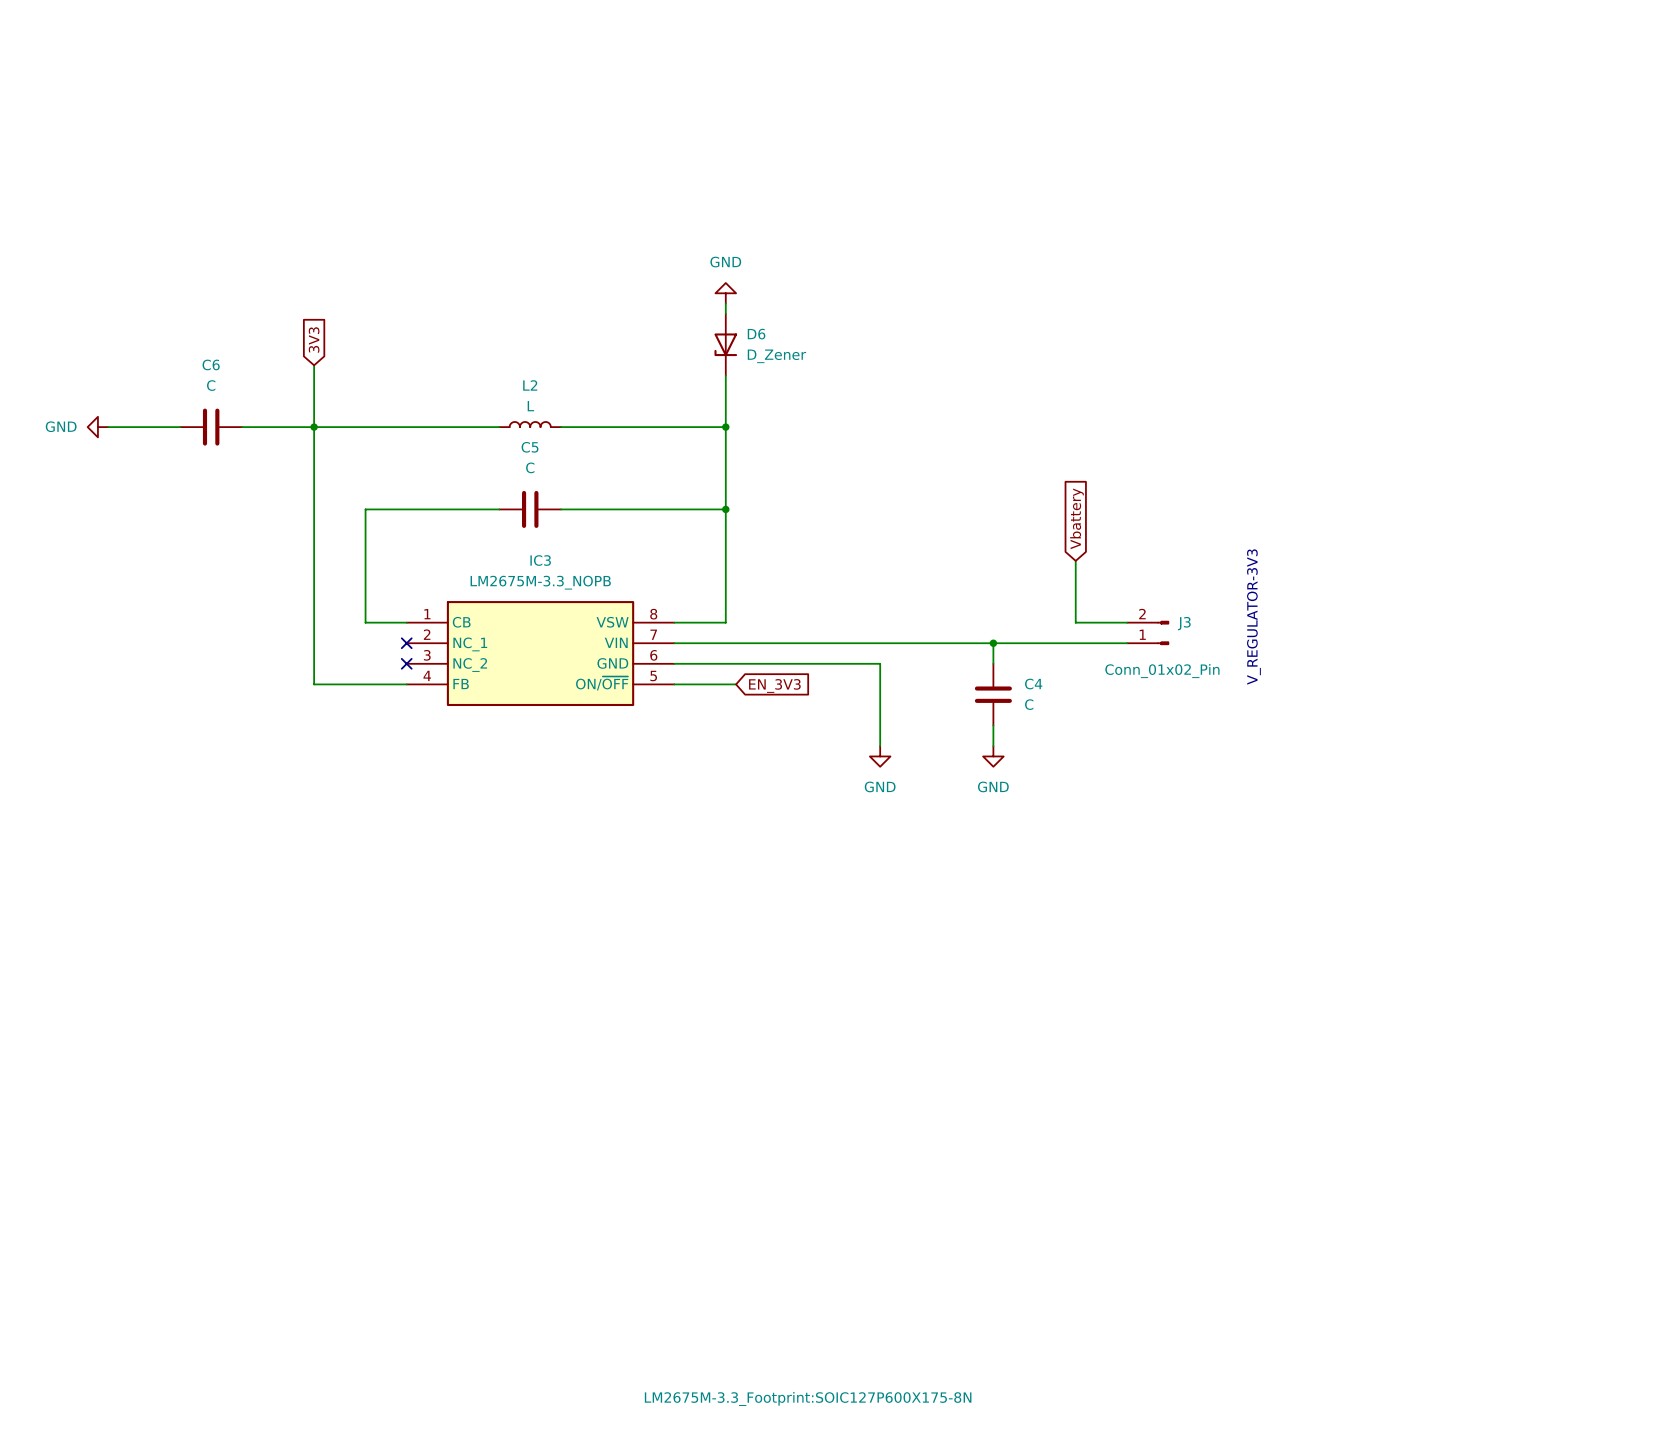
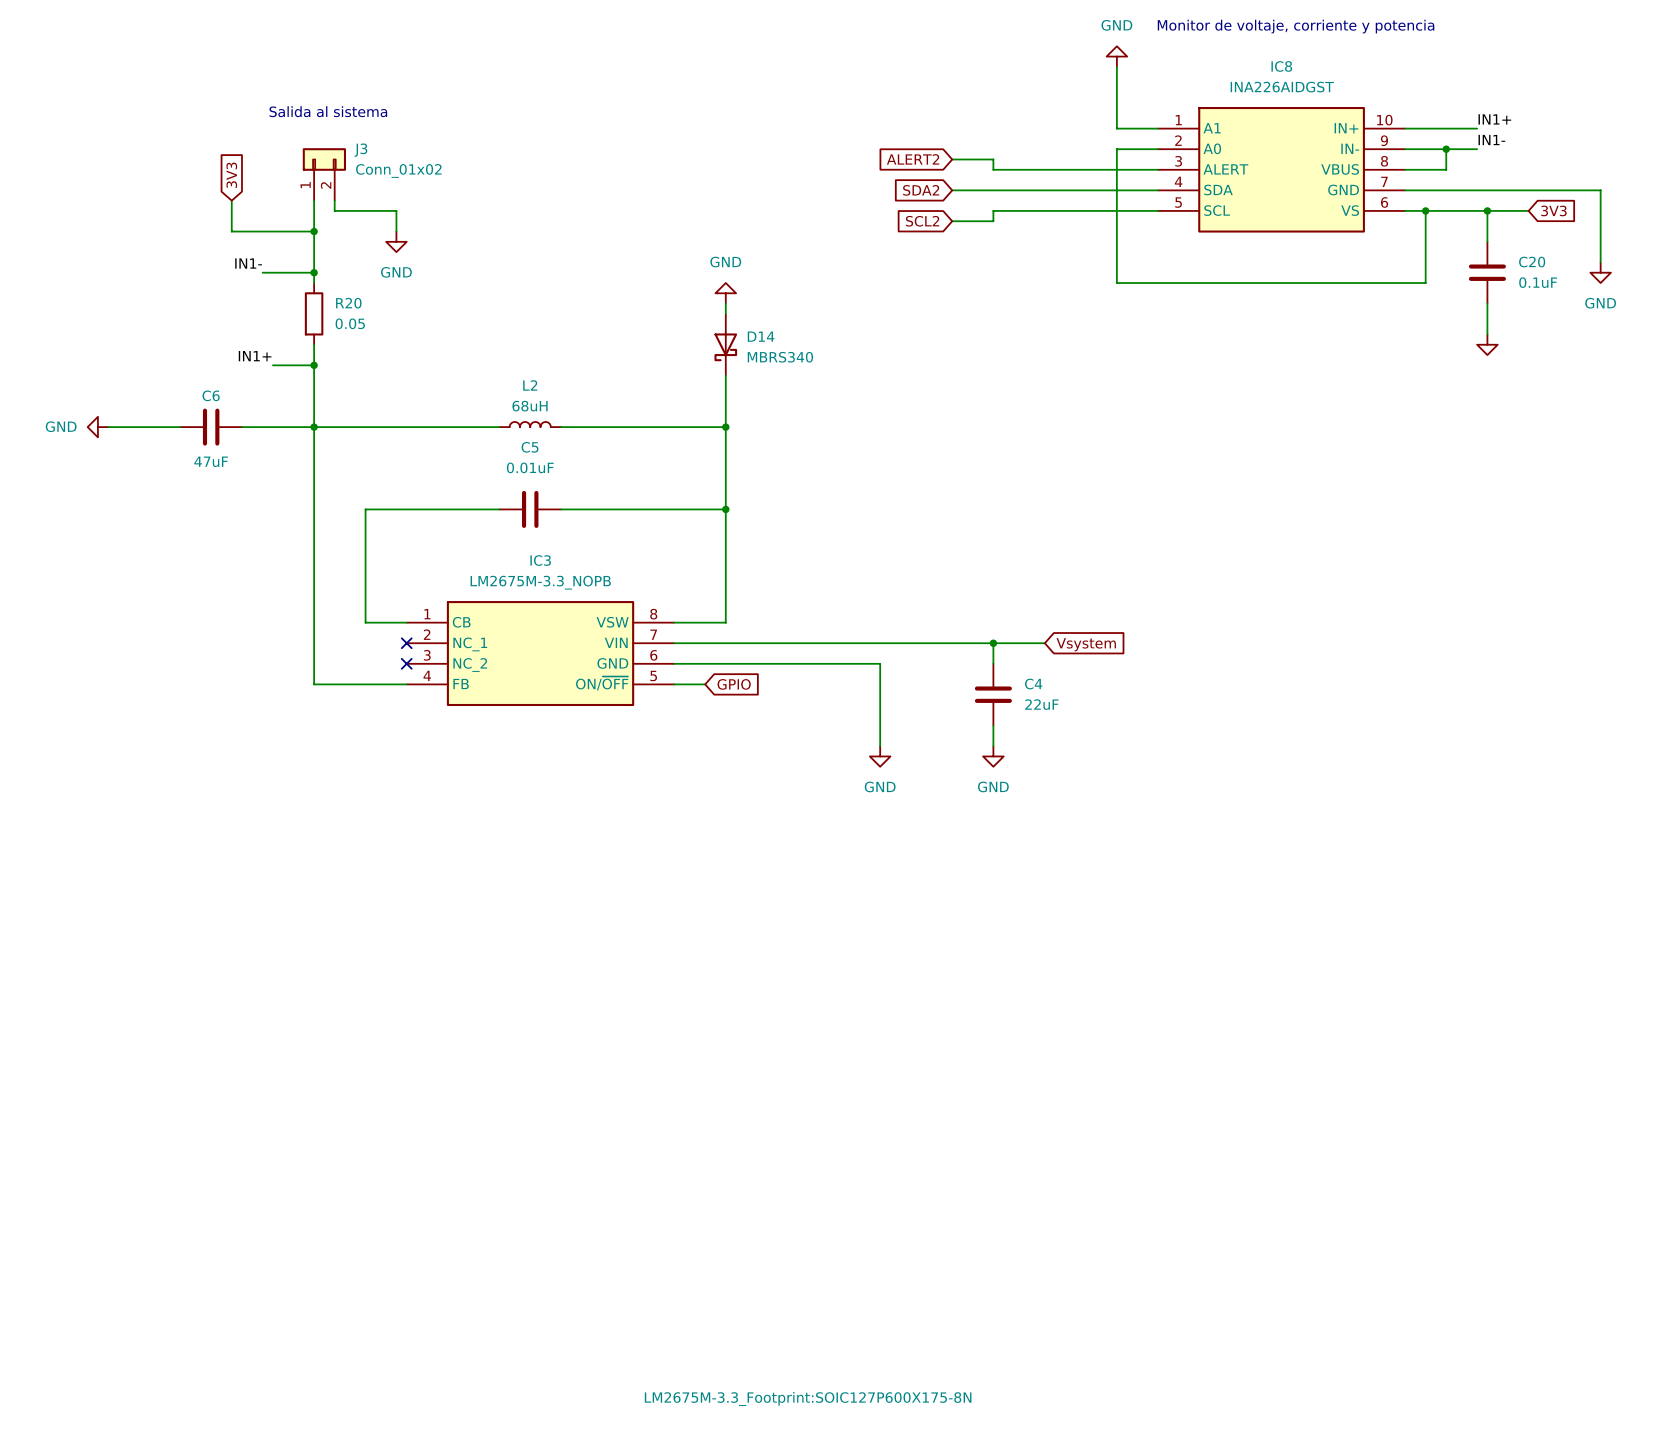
text: none -> Monitor de voltaje, corriente y potencia (1296, 26)
power symbol: none -> GND (1116, 56)
wire: none -> (1116, 66) (1116, 128) (1158, 128)
text: none -> Salida al sistema (328, 111)
label: none -> IN1+ (1494, 119)
wire: none -> (1405, 128) (1477, 128)
label: none -> IN1- (1491, 140)
wire: none -> (1158, 149) (1116, 149) (1116, 283) (1425, 283) (1425, 210)
wire: none -> (1405, 149) (1477, 149)
wire: none -> (1446, 149) (1446, 169) (1405, 169)
junction: none -> (1446, 149)
global label: none -> ALERT2 (913, 159)
wire: none -> (952, 159) (993, 159) (993, 169) (1158, 169)
IC8: none -> INA226AIDGST (1281, 169)
global label: none -> SDA2 (921, 190)
wire: none -> (952, 190) (1158, 190)
wire: none -> (1405, 190) (1600, 190) (1600, 262)
wire: none -> (231, 200) (231, 231) (314, 231)
wire: none -> (314, 200) (314, 283)
wire: none -> (334, 200) (334, 210) (396, 210) (396, 231)
wire: none -> (1158, 210) (993, 210) (993, 221) (952, 221)
wire: none -> (1405, 210) (1528, 210)
junction: none -> (1425, 210)
wire: none -> (1487, 210) (1487, 241)
junction: none -> (1487, 210)
global label: none -> 3V3 (1553, 210)
global label: none -> SCL2 (922, 221)
junction: none -> (314, 231)
power symbol: none -> GND (396, 241)
label: none -> IN1- (248, 263)
wire: none -> (262, 272) (314, 272)
junction: none -> (314, 272)
C20: none -> 0.1uF (1487, 272)
power symbol: none -> GND (1600, 272)
wire: none -> (1487, 303) (1487, 334)
R20: none -> 0.05 (314, 313)
global label position: 3V3 (314, 339) -> 3V3 (231, 175)
wire: none -> (314, 344) (314, 365) (272, 365)
D6: D_Zener (725, 344) -> none
D14: none -> MBRS340 (725, 344)
power symbol: none -> (1487, 344)
label: none -> IN1+ (255, 356)
C6 name position: C6 (211, 364) -> C6 (211, 395)
junction: none -> (314, 365)
C6 value: C (211, 385) -> 47uF (211, 461)
L2 value: L (530, 406) -> 68uH (530, 406)
C5 value: C (530, 467) -> 0.01uF (530, 467)
global label: Vbattery (1076, 518) -> none
wire: (1075, 560) (1075, 622) (1127, 622) -> none
text: V_REGULATOR-3V3 (1253, 617) -> none
J3 symbol: [1127, 621, 1169, 645] -> [302, 148, 347, 201]
wire: (1044, 643) (1127, 643) -> none
global label: none -> Vsystem (1086, 644)
J3 value: Conn_01x02_Pin (1162, 671) -> Conn_01x02 (398, 170)
wire: (705, 684) (736, 684) -> none
global label: none -> GPIO (734, 684)
global label: EN_3V3 (774, 685) -> none
C4 value: C (1029, 704) -> 22uF (1041, 704)

